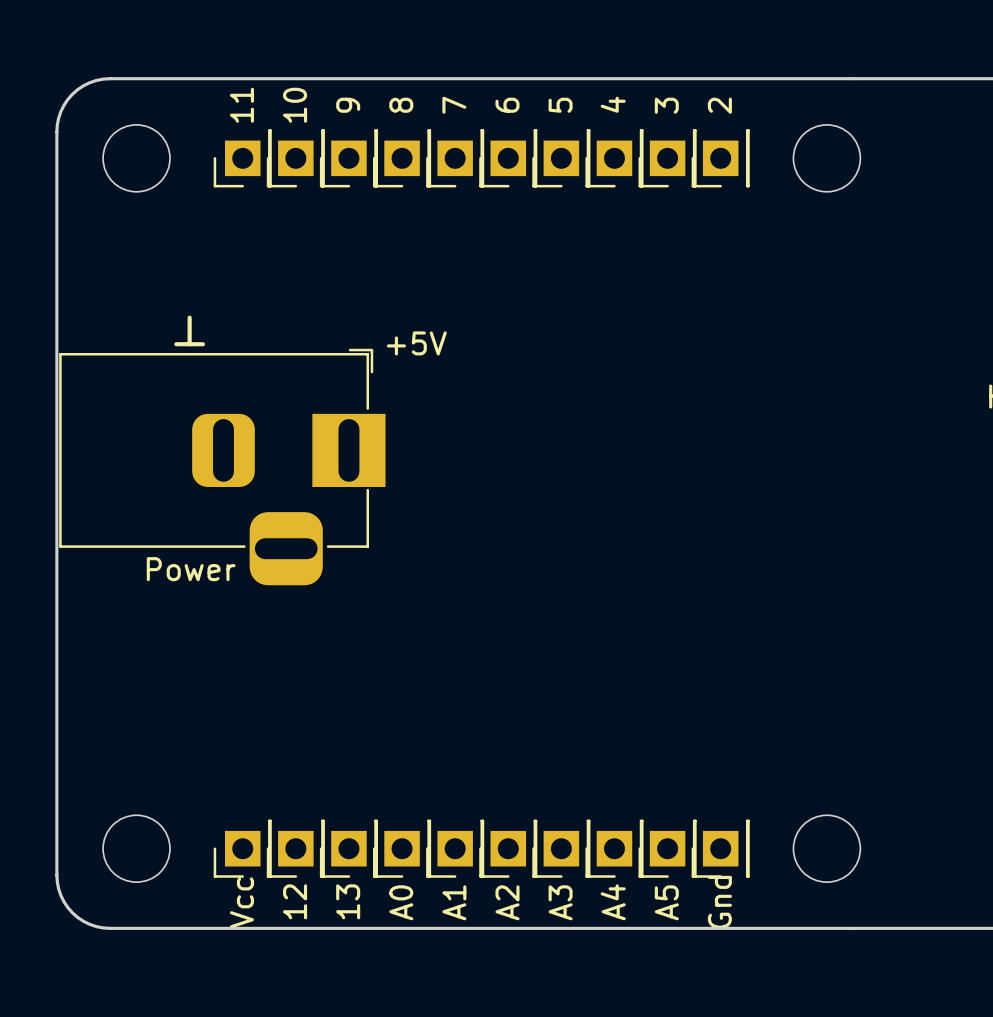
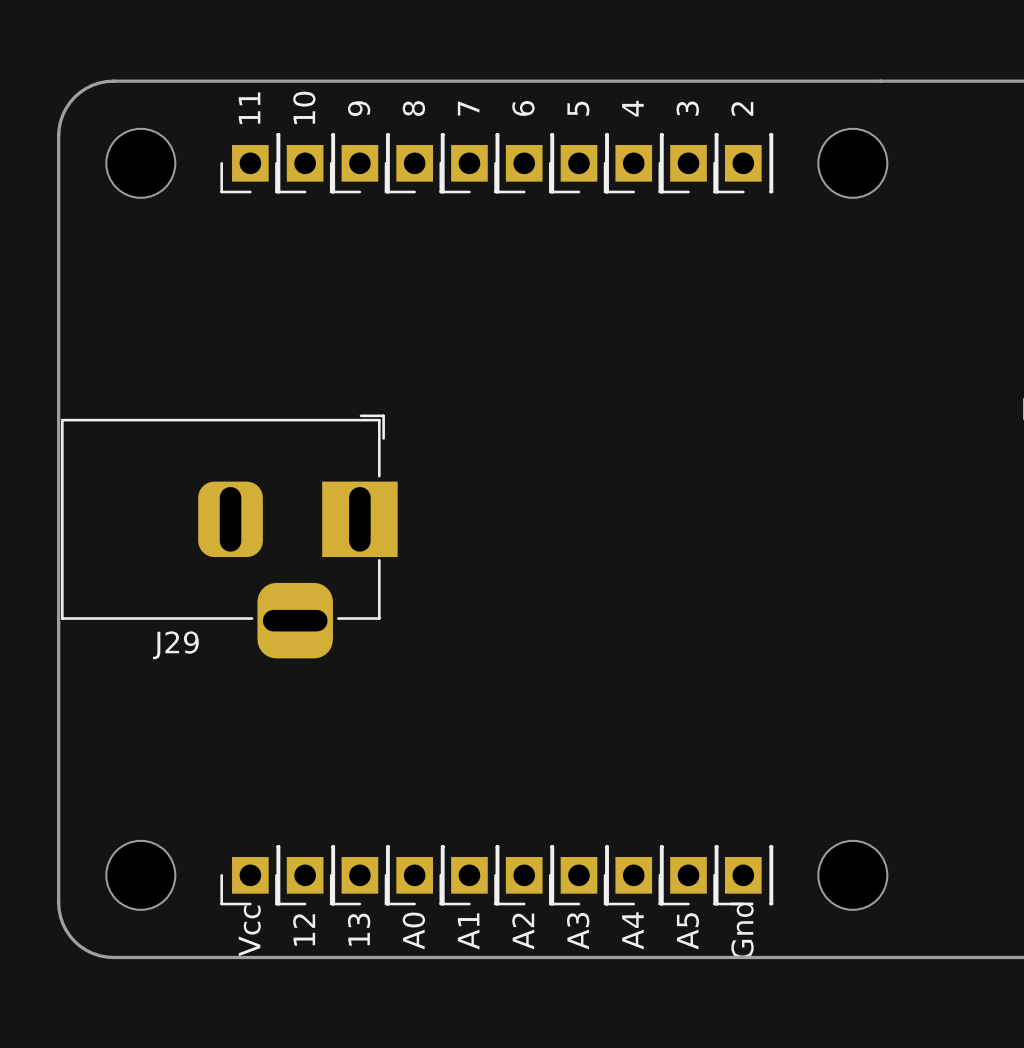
line: (189, 317) (189, 344) -> none
text: +5V (416, 343) -> none
line: (176, 344) (202, 344) -> none
part: (222, 467) -> none
J29: none -> (229, 536)
text: Power (191, 569) -> none

